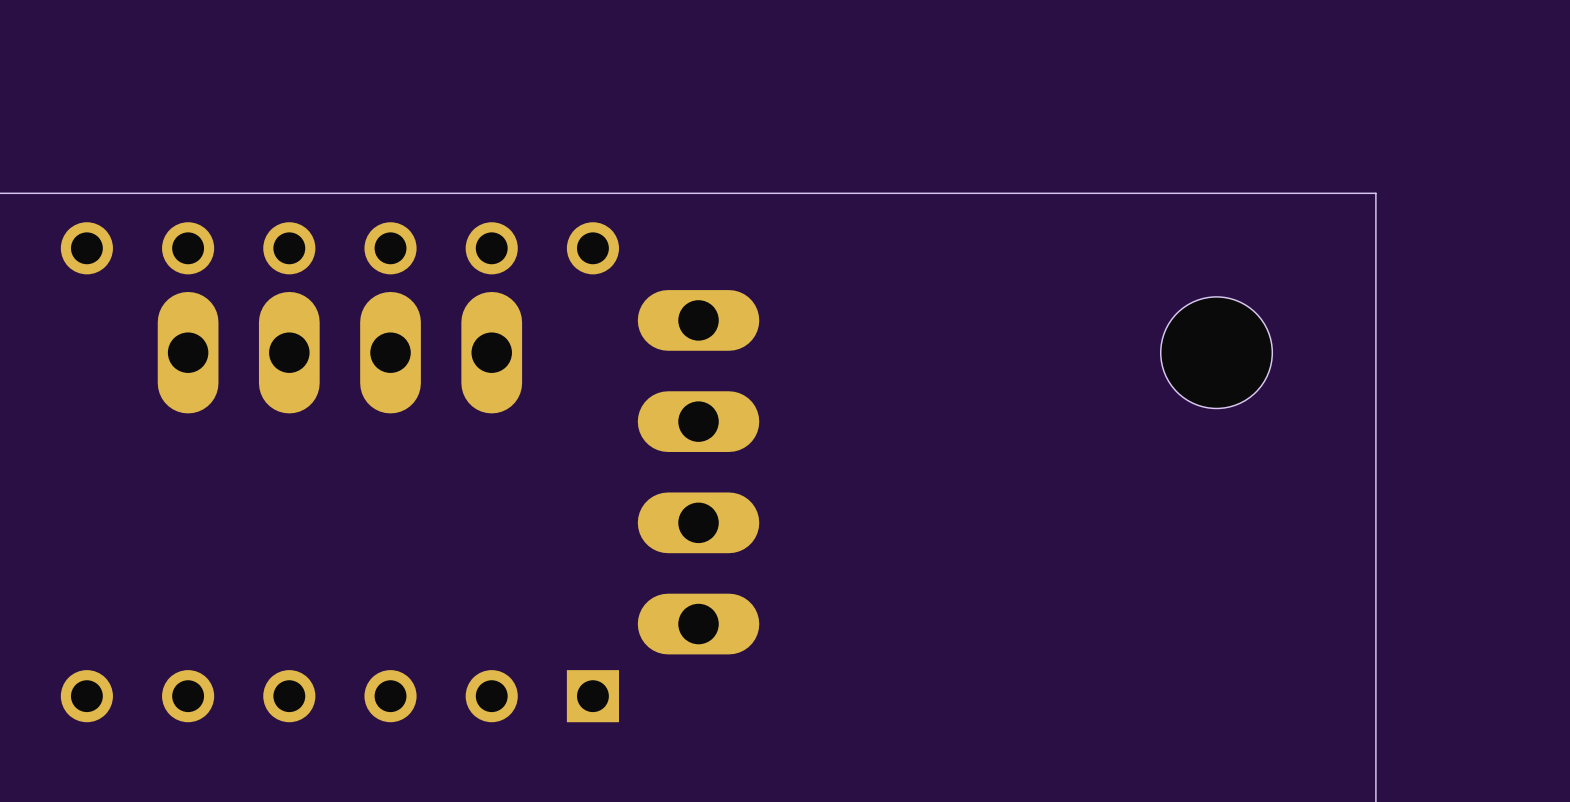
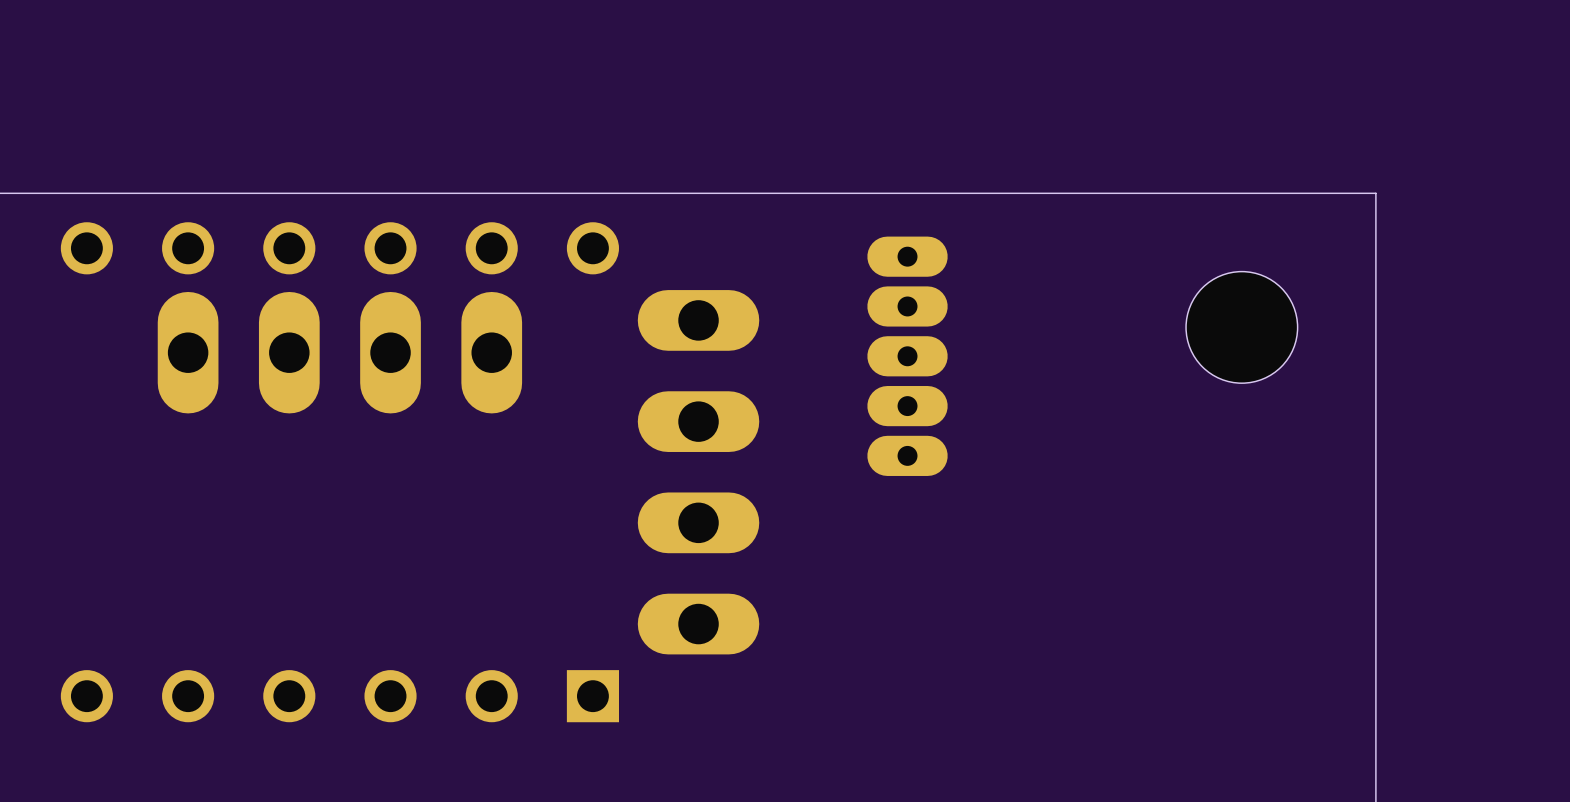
part position: (1216, 352) -> (1241, 327)
part: none -> (907, 356)

